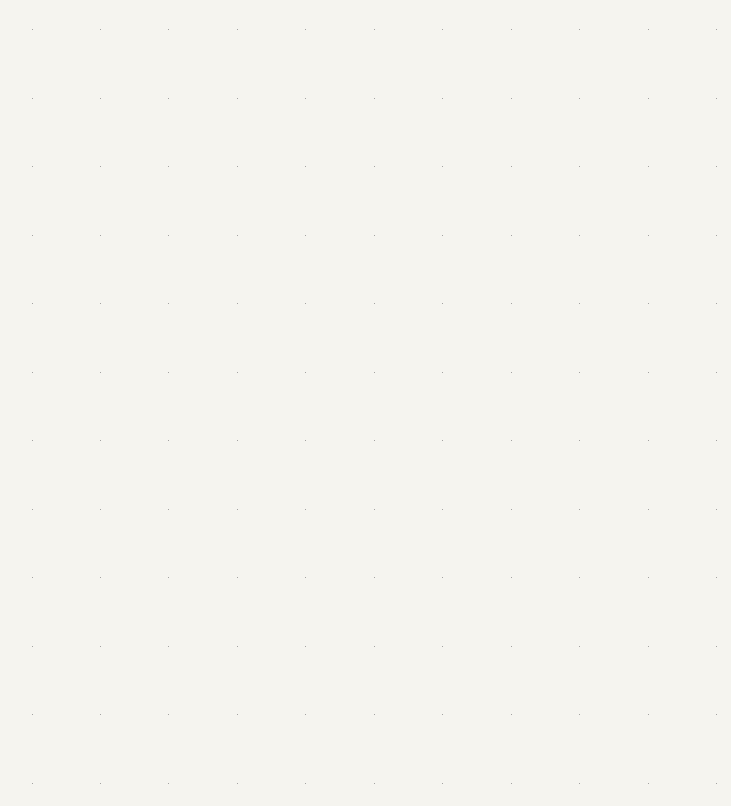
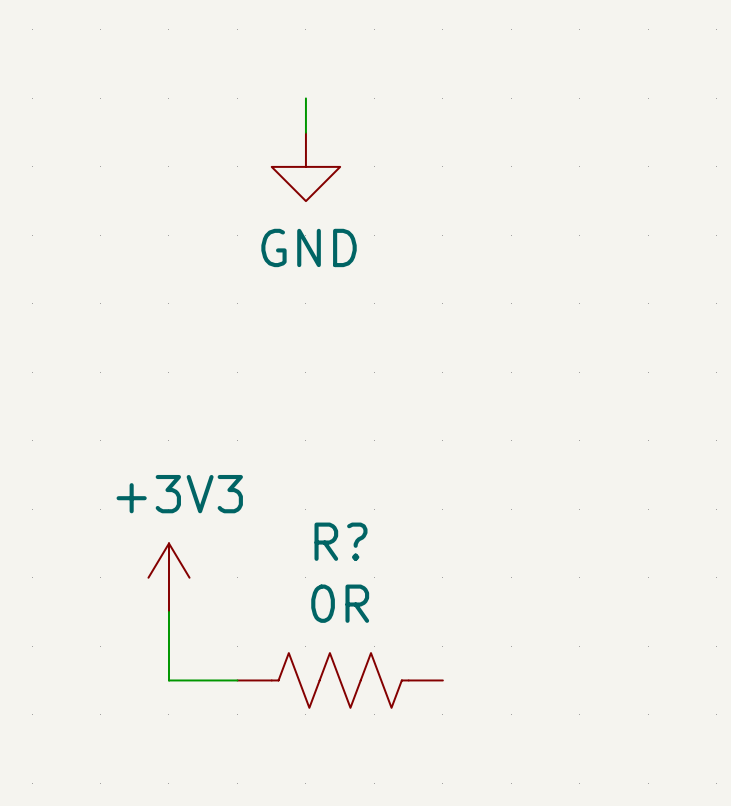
wire: none -> (305, 98) (305, 132)
power symbol: none -> GND (305, 166)
power symbol: none -> +3V3 (168, 577)
wire: none -> (168, 611) (168, 680) (237, 680)
R?: none -> 0R (340, 680)

